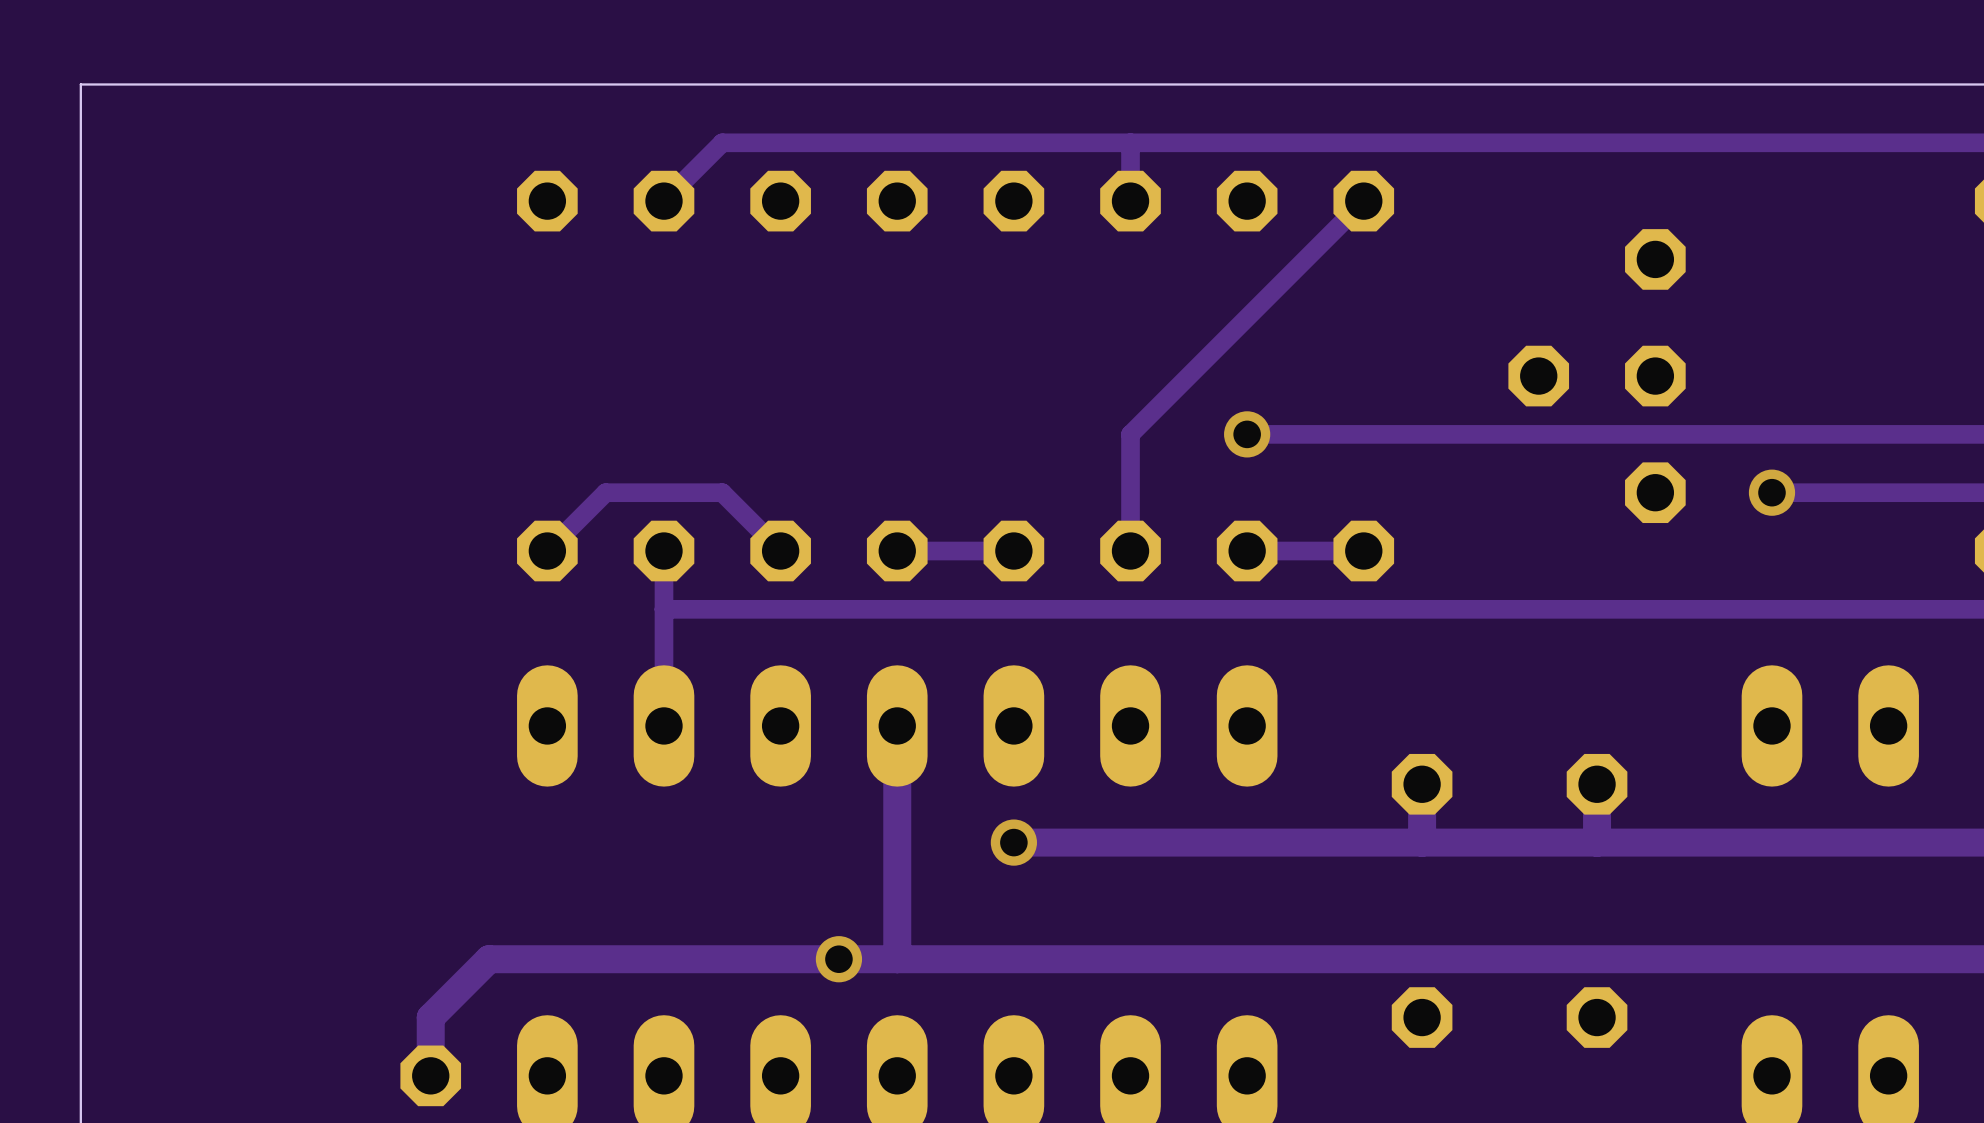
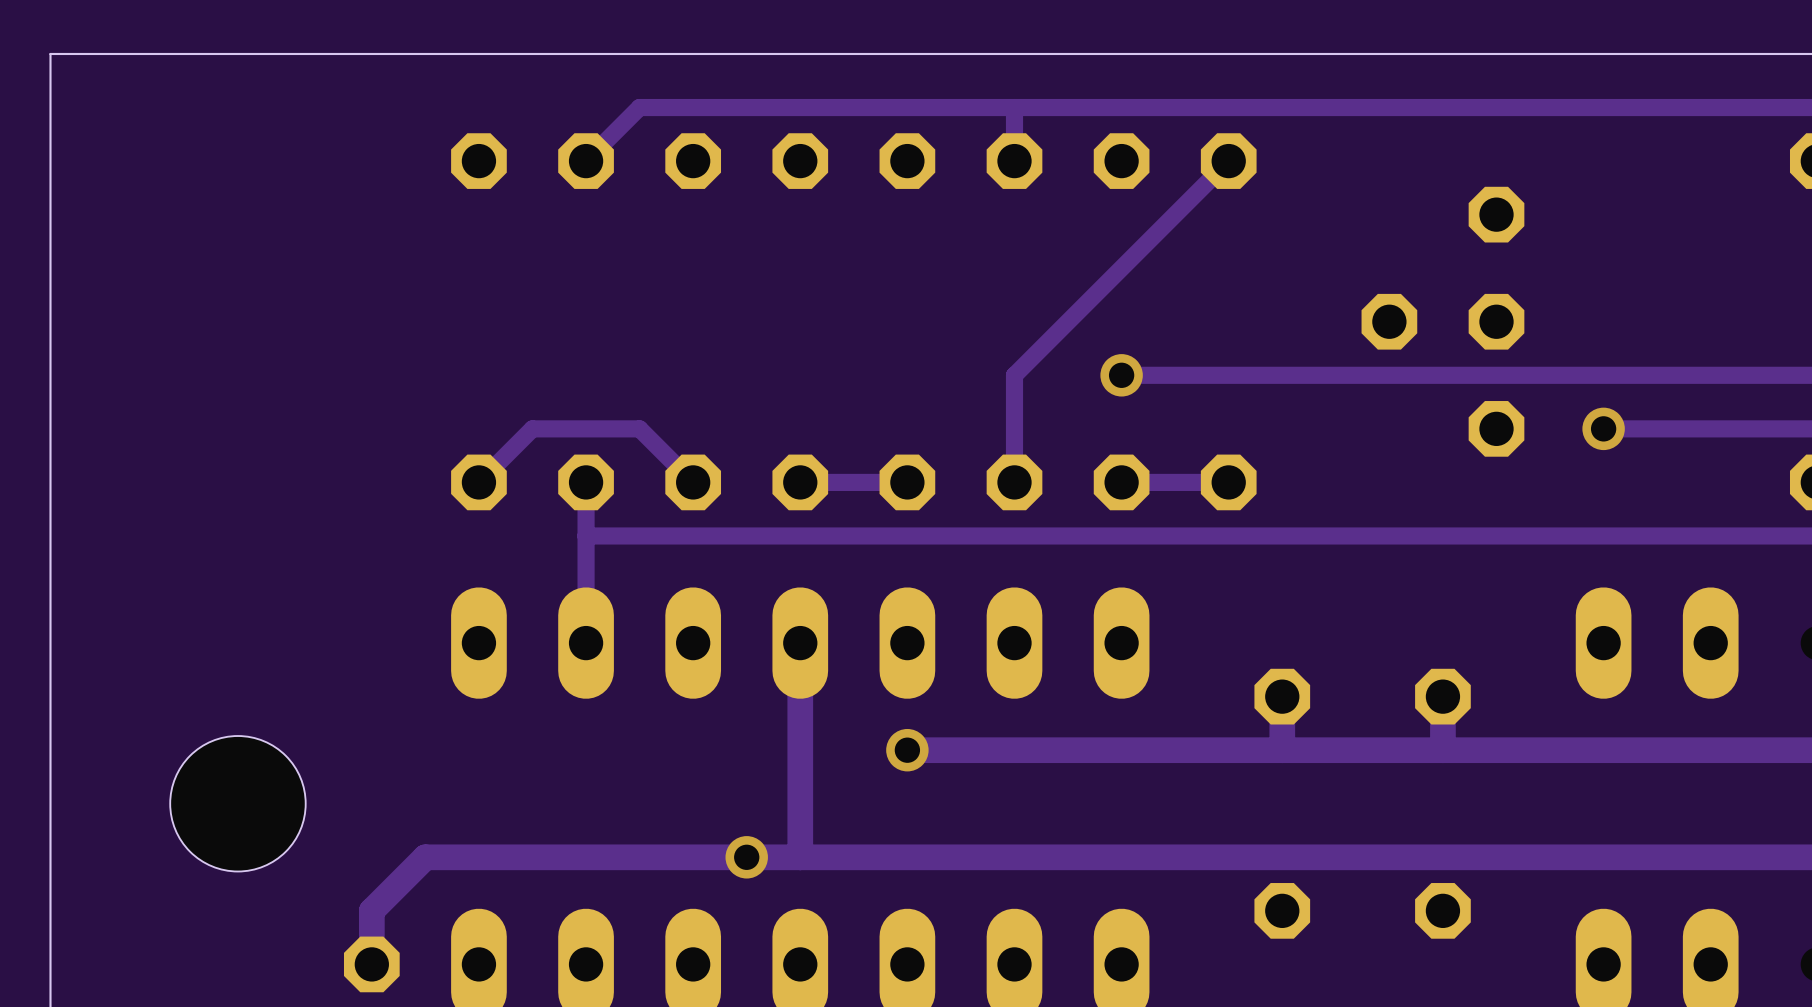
part: none -> (237, 803)

